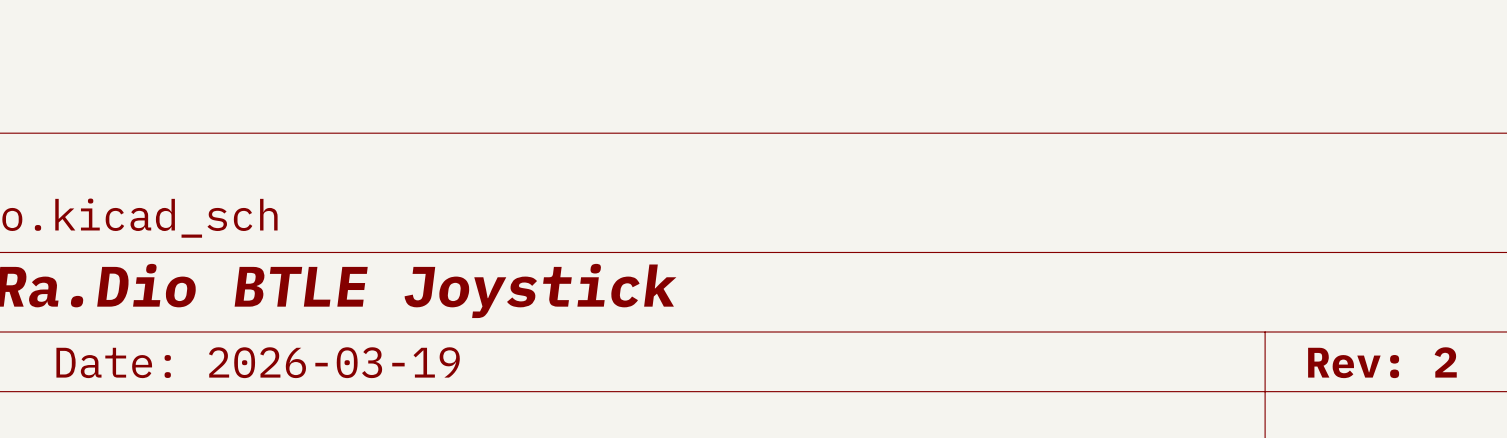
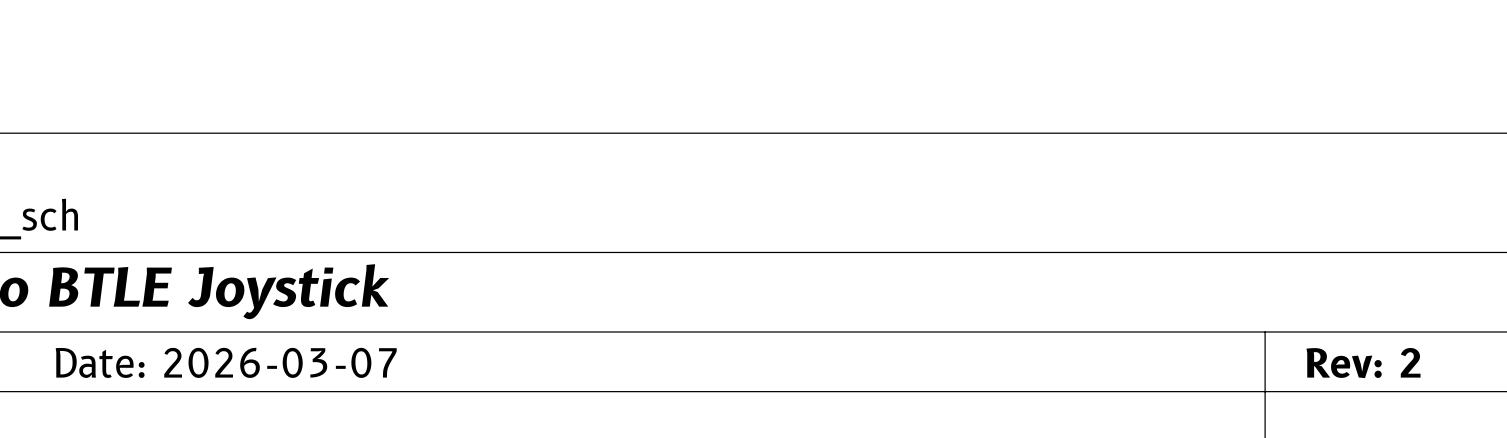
title block: Date: 2026-03-19 (258, 362) -> Date: 2026-03-07 (226, 362)

